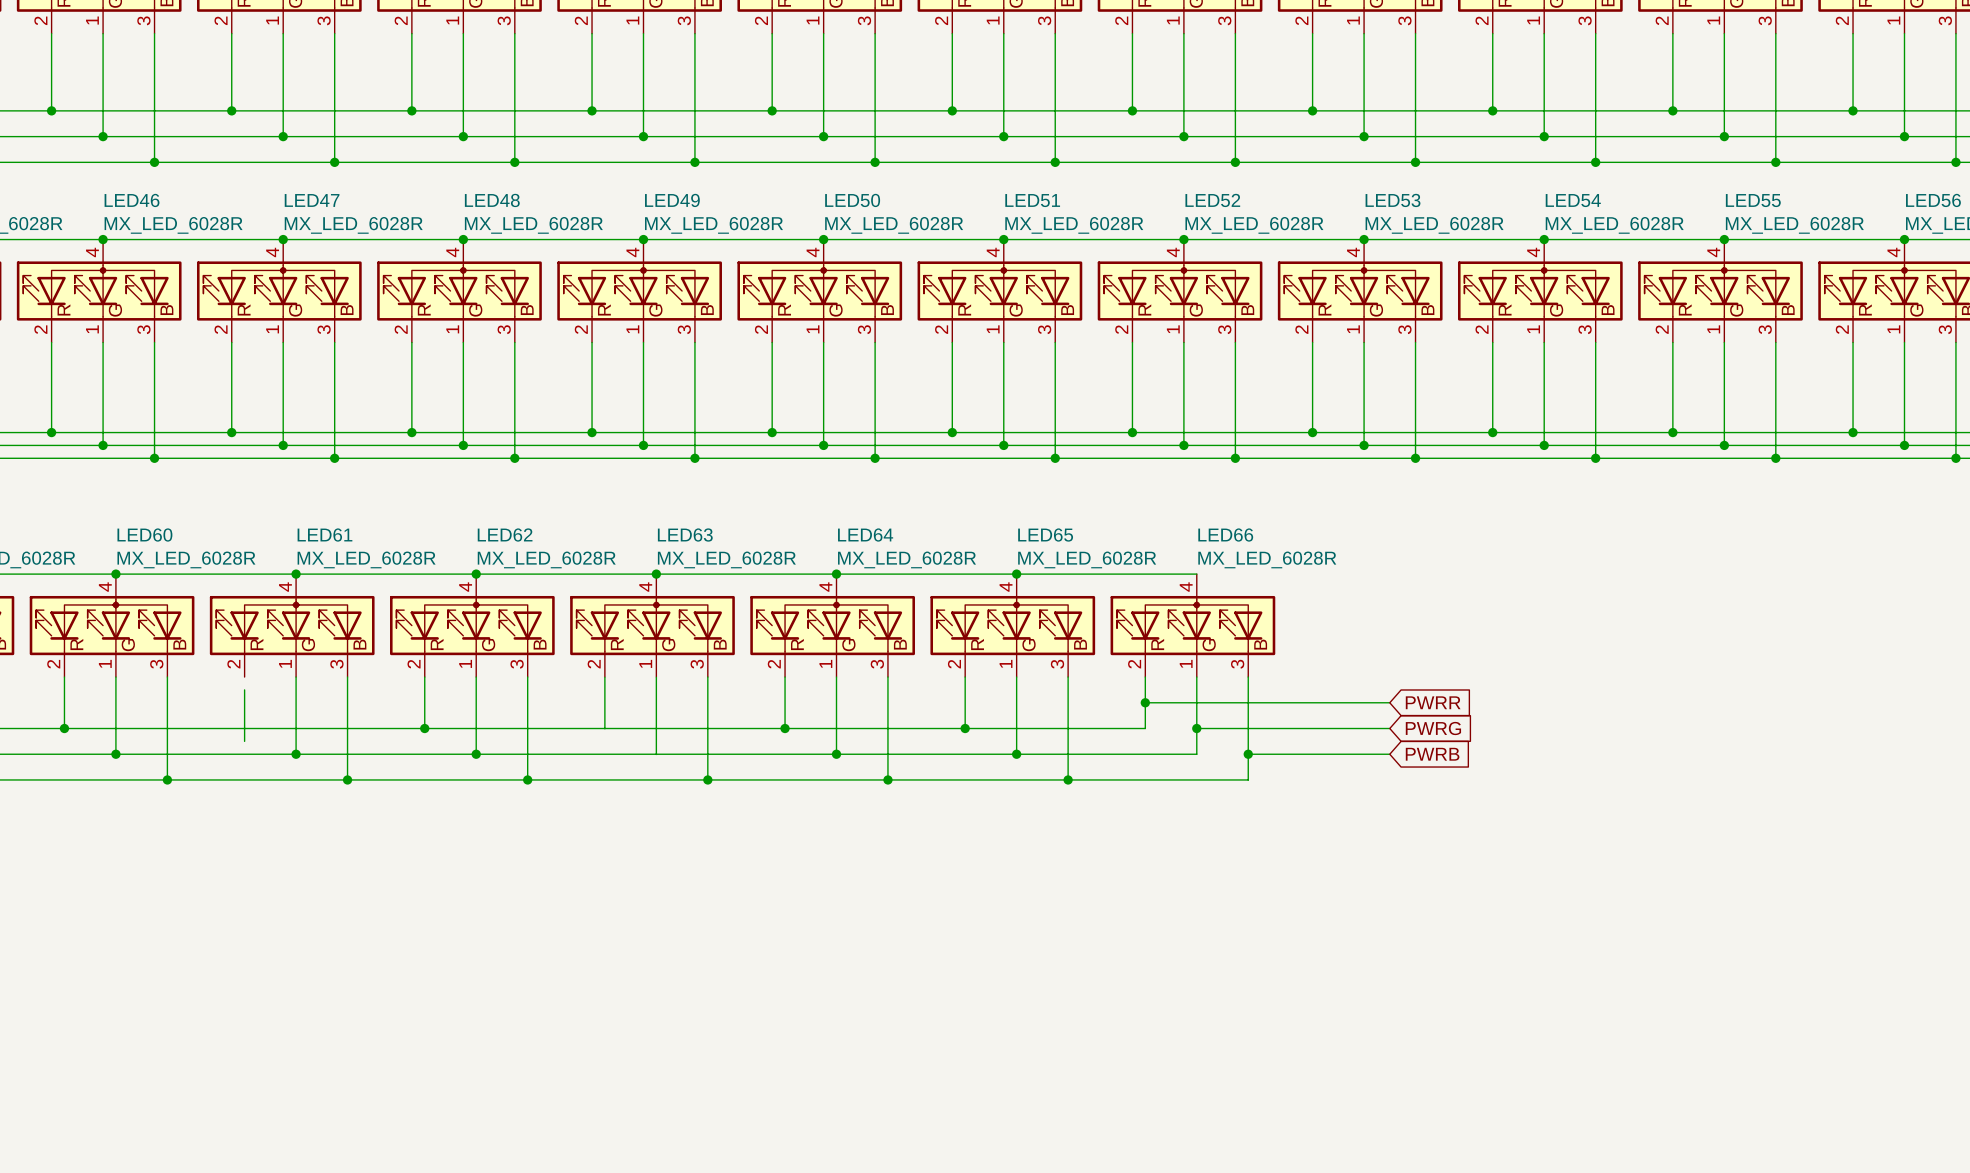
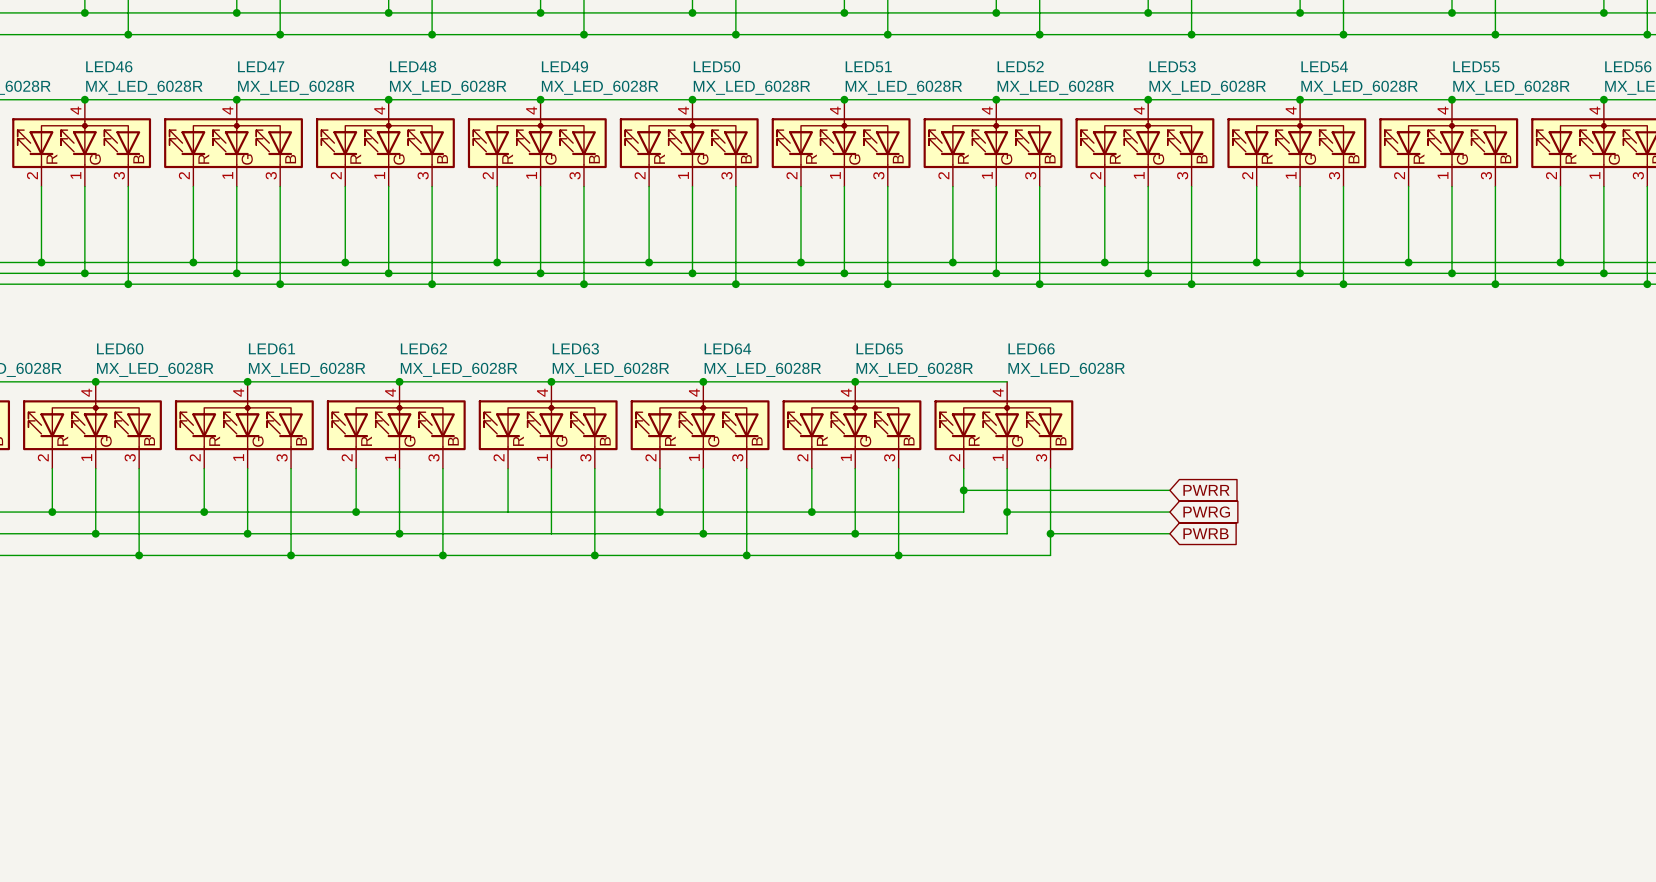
wire: (244, 728) (244, 741) -> (204, 468) (204, 479)
junction: none -> (204, 512)

